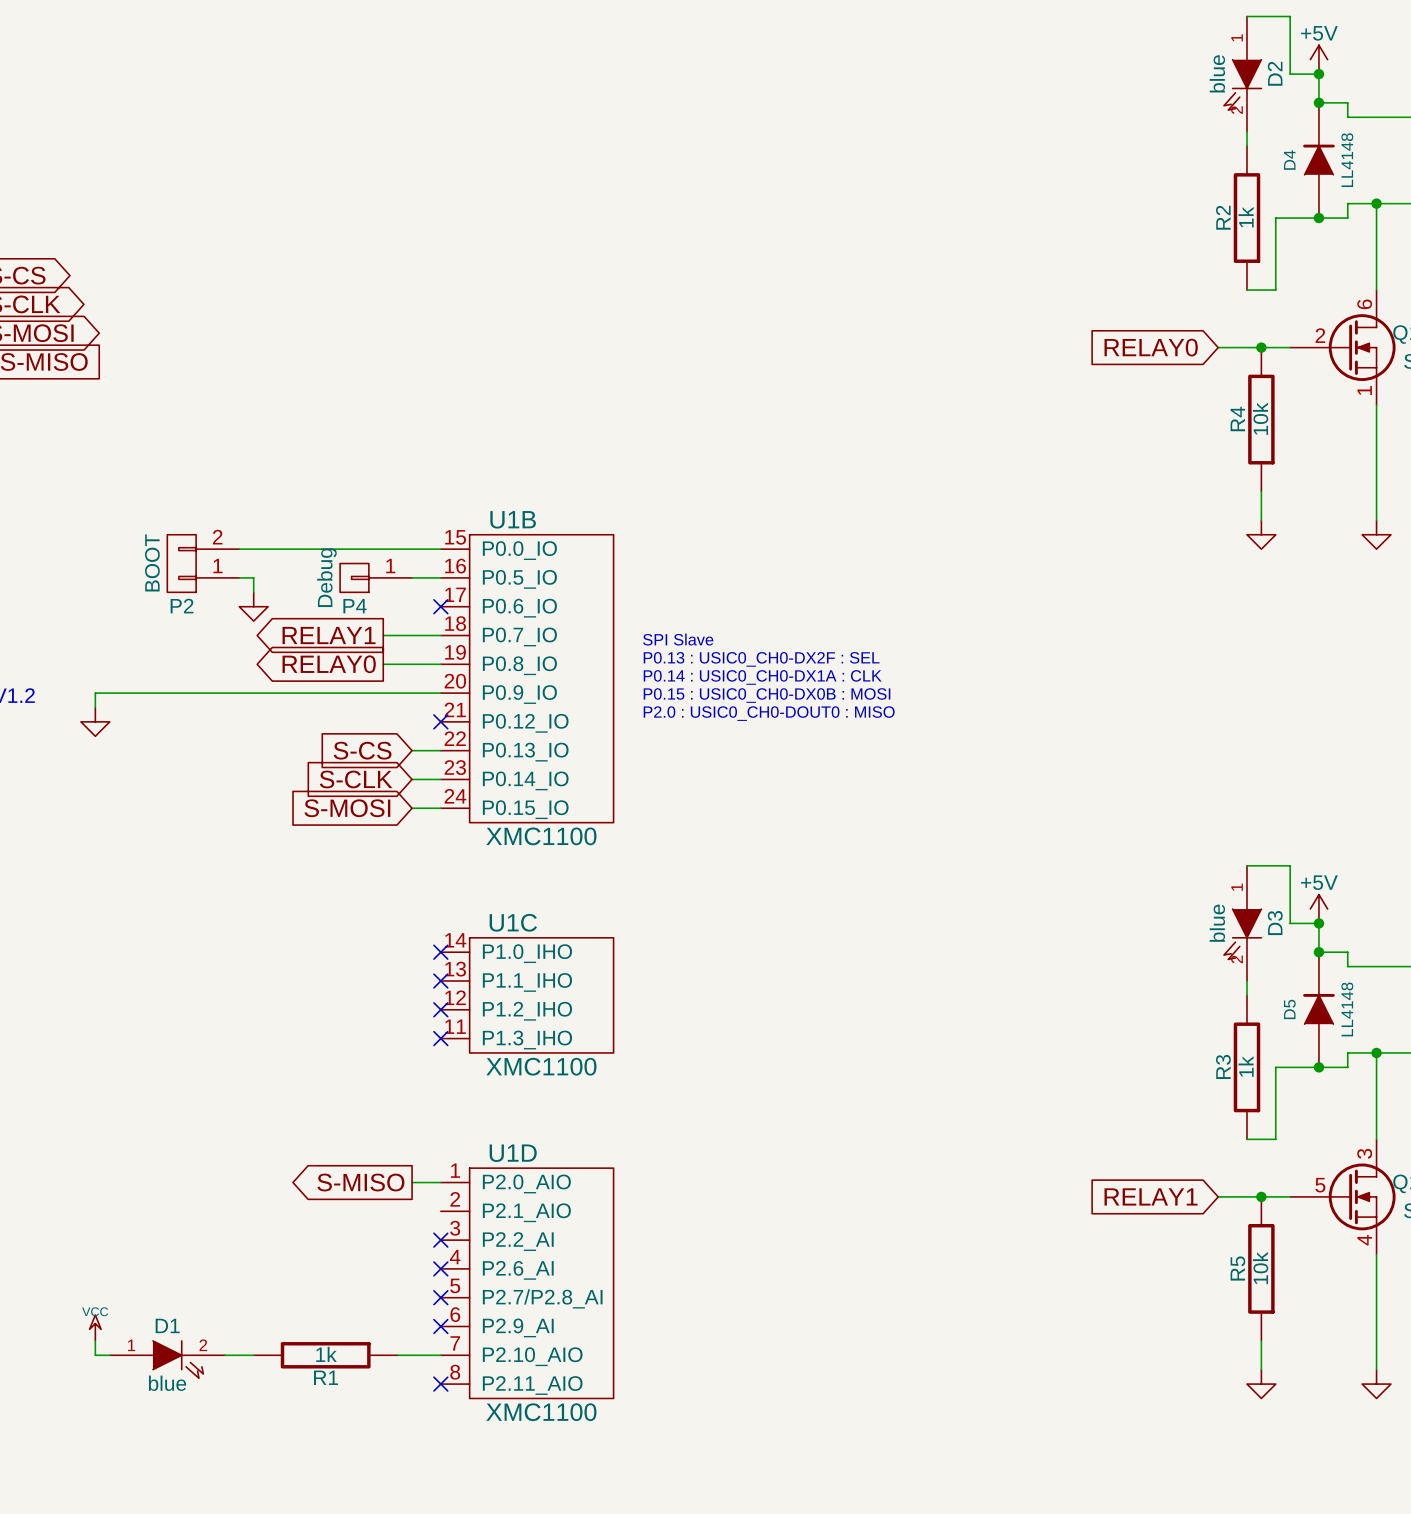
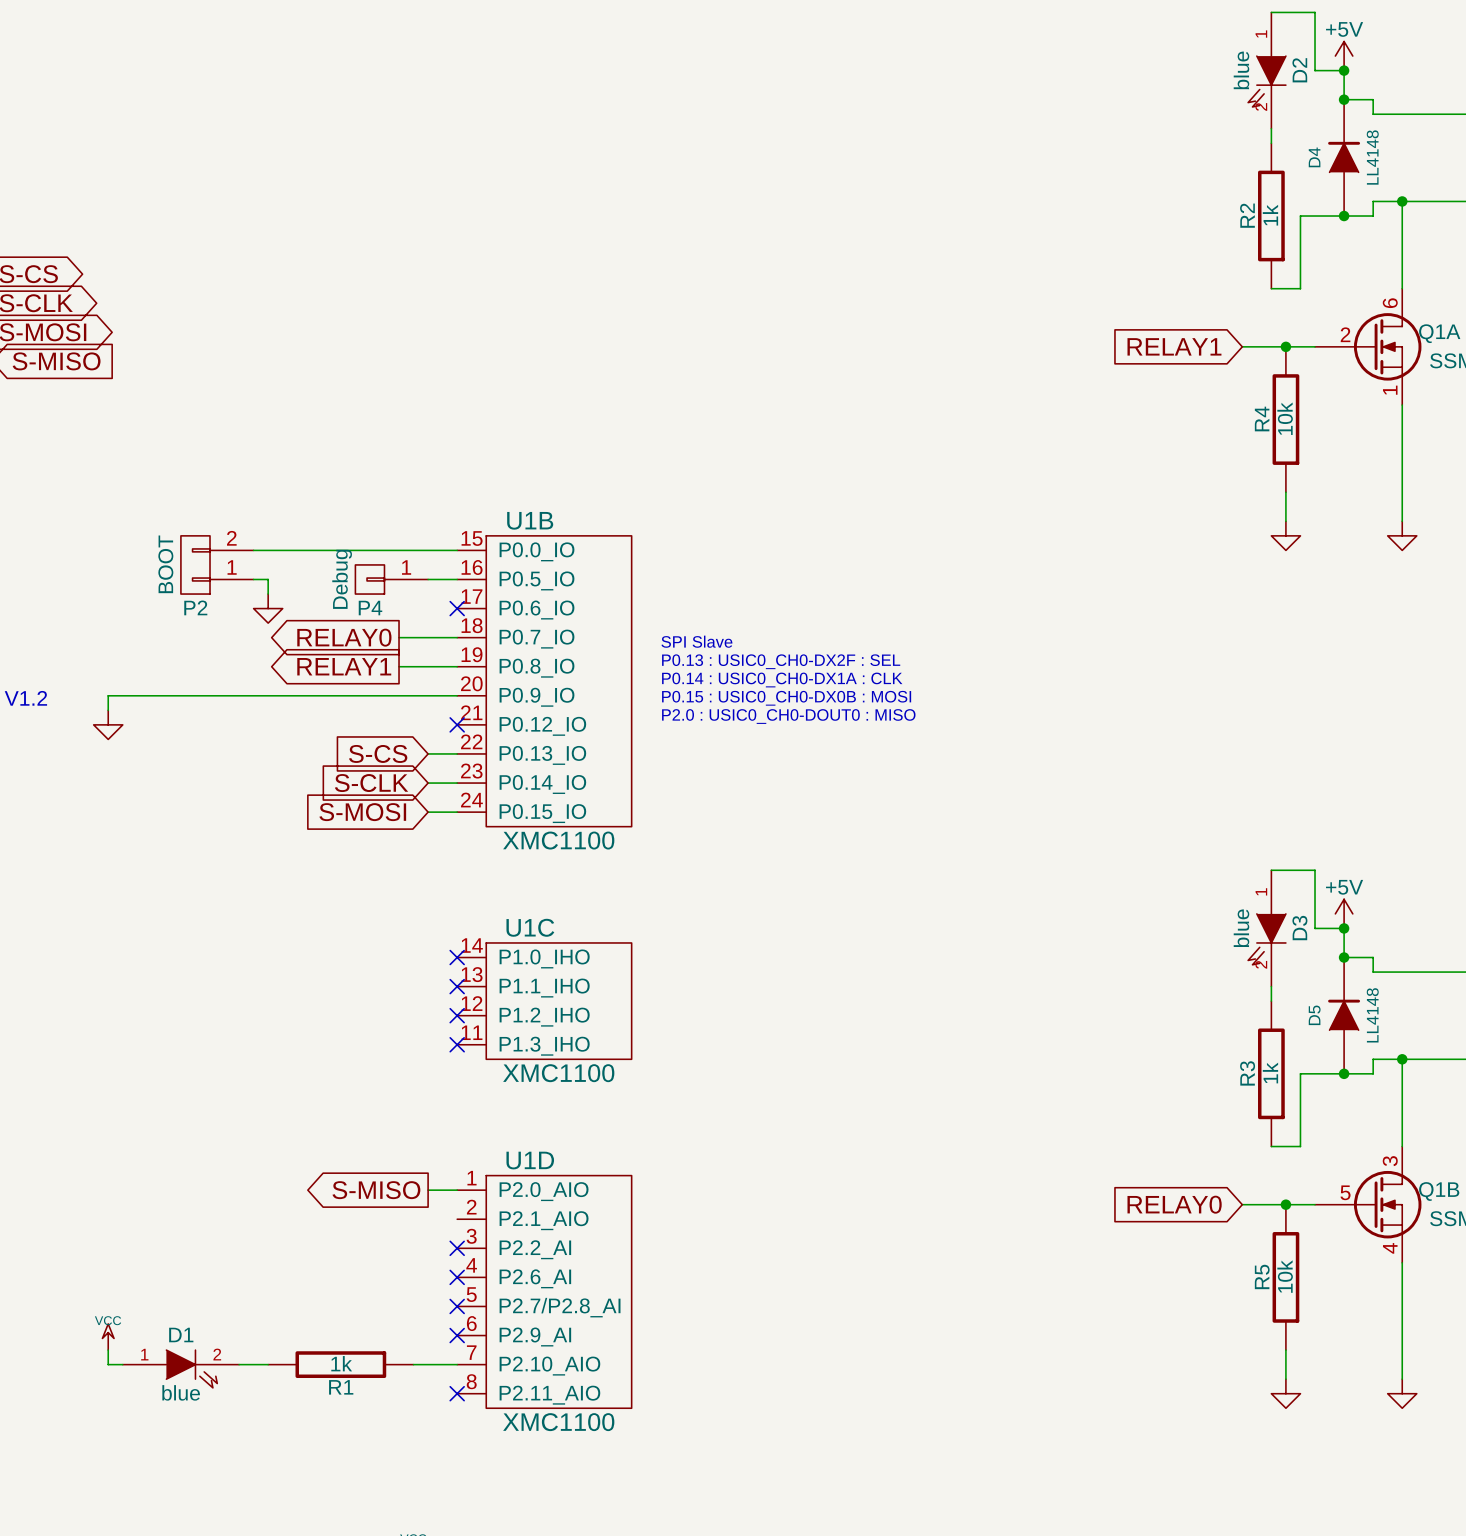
global label: RELAY0 (1151, 347) -> RELAY1 (1174, 346)
global label: RELAY1 (329, 635) -> RELAY0 (344, 637)
global label: RELAY0 (329, 664) -> RELAY1 (344, 666)
global label: RELAY1 (1151, 1196) -> RELAY0 (1174, 1204)

